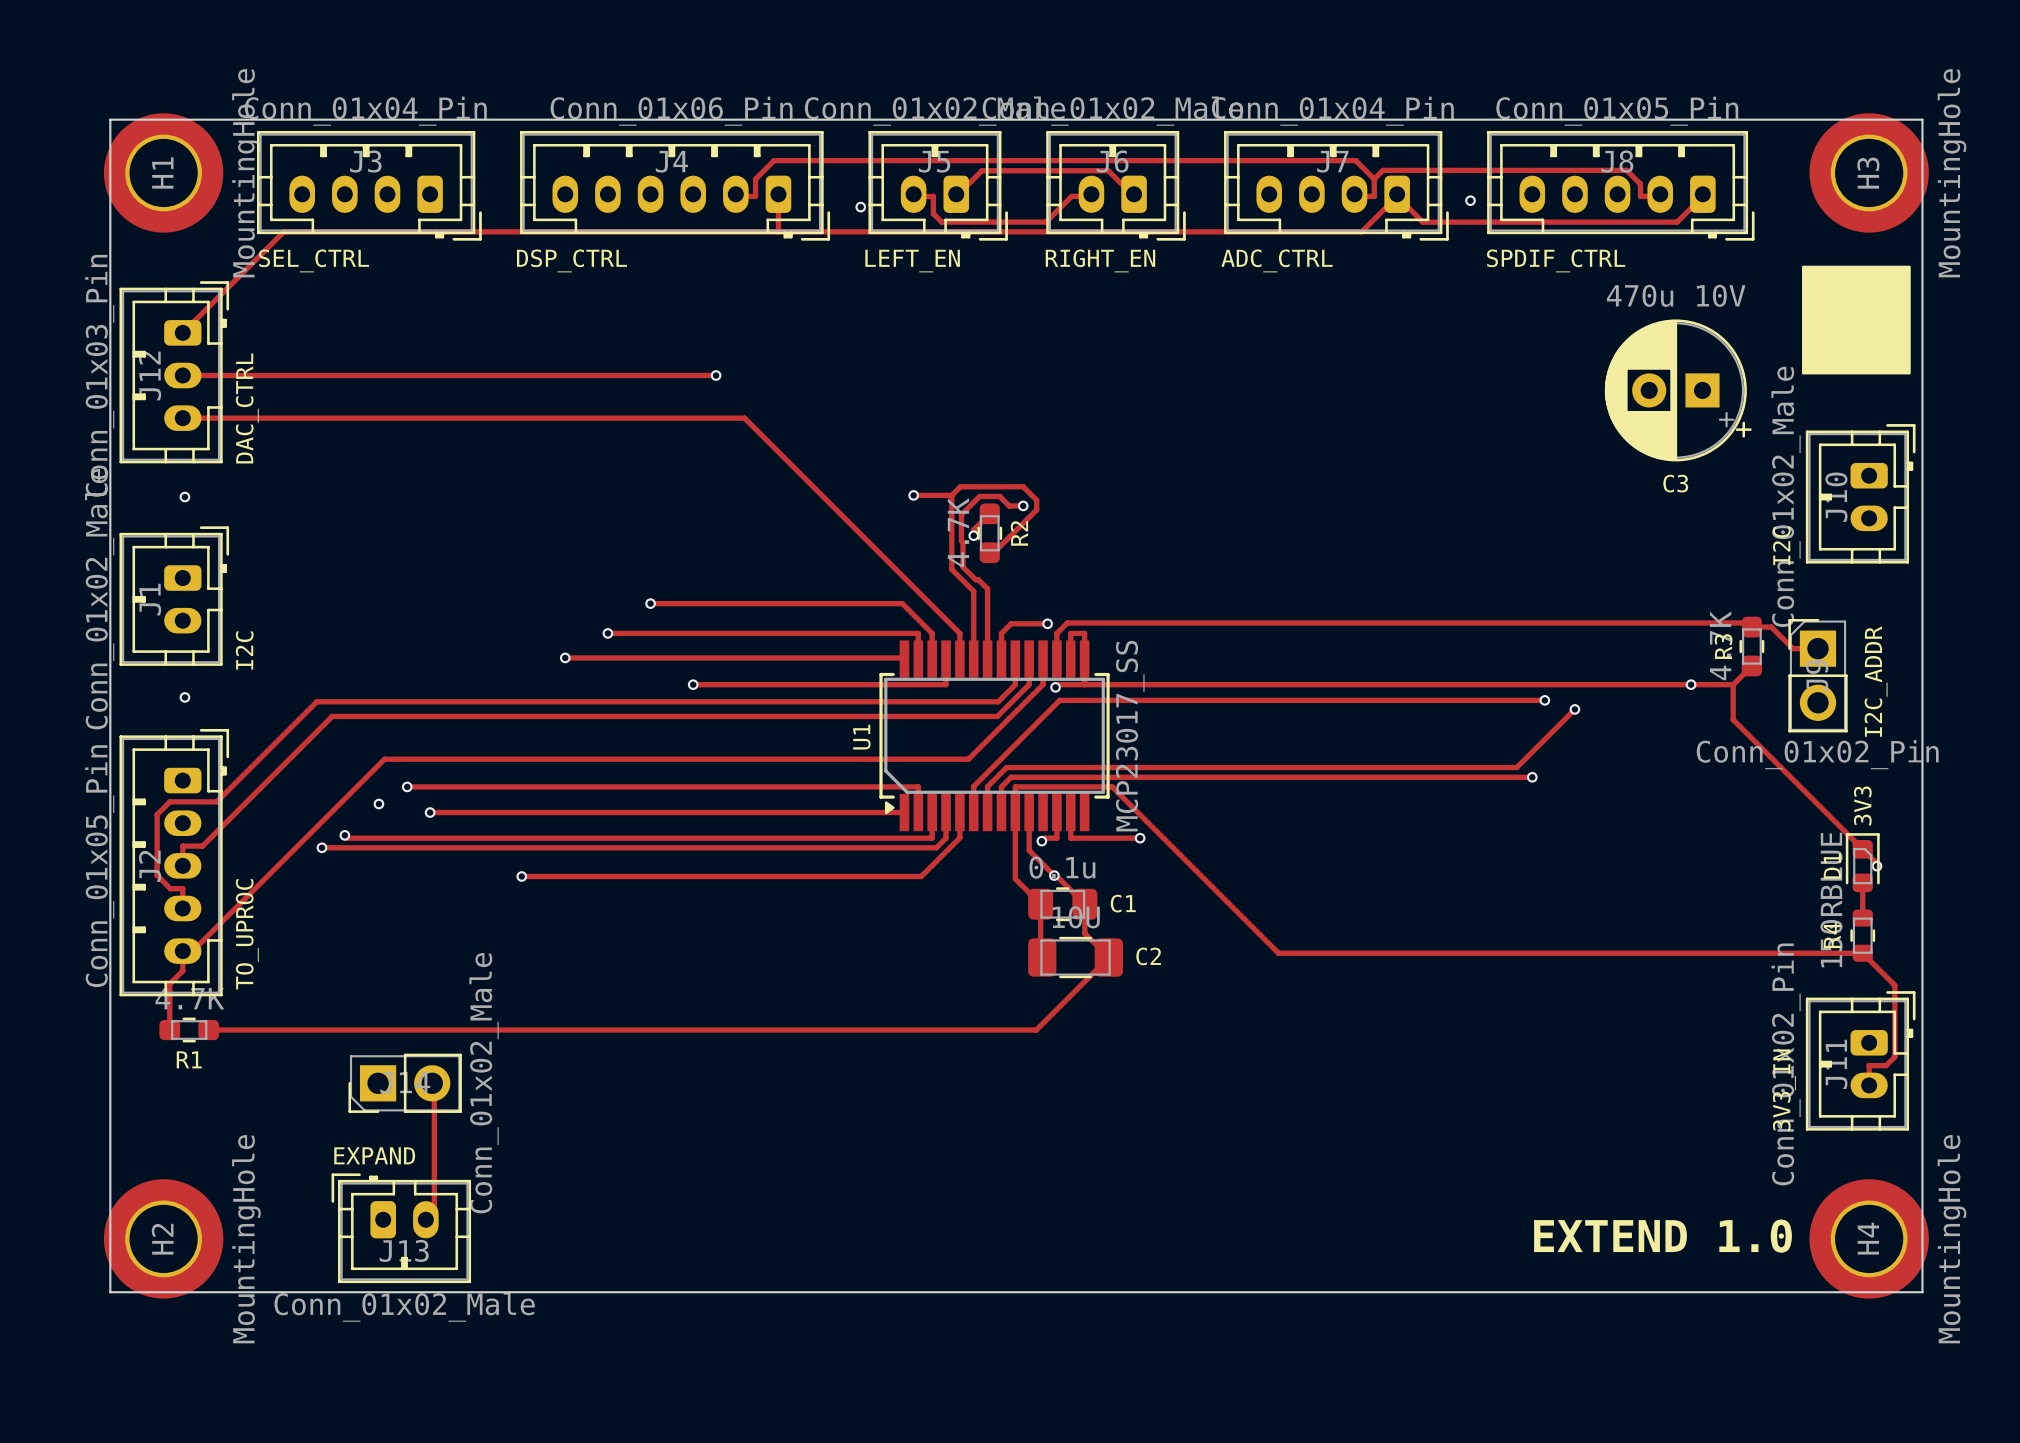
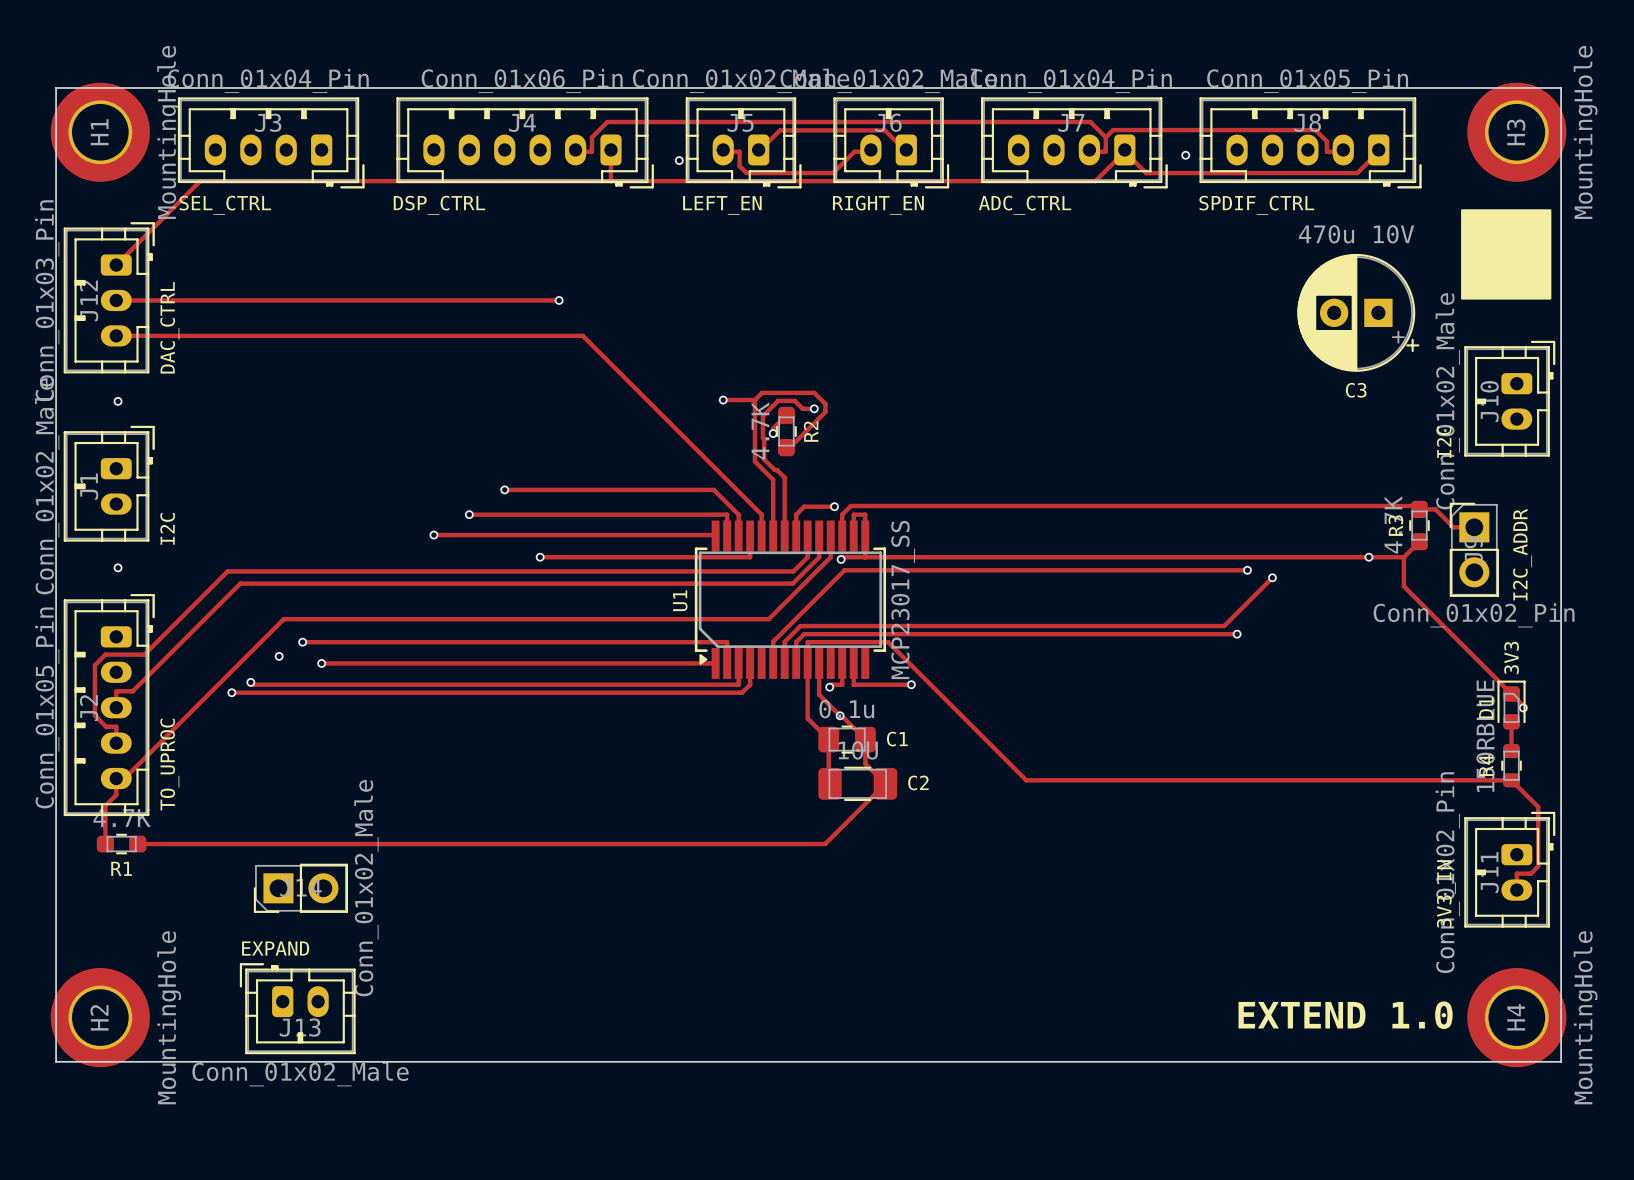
track: (959, 812) (959, 837) (921, 876) (521, 876) -> none
via: (521, 876) -> none
track: (434, 1083) (434, 1213) (425, 1221) -> none

